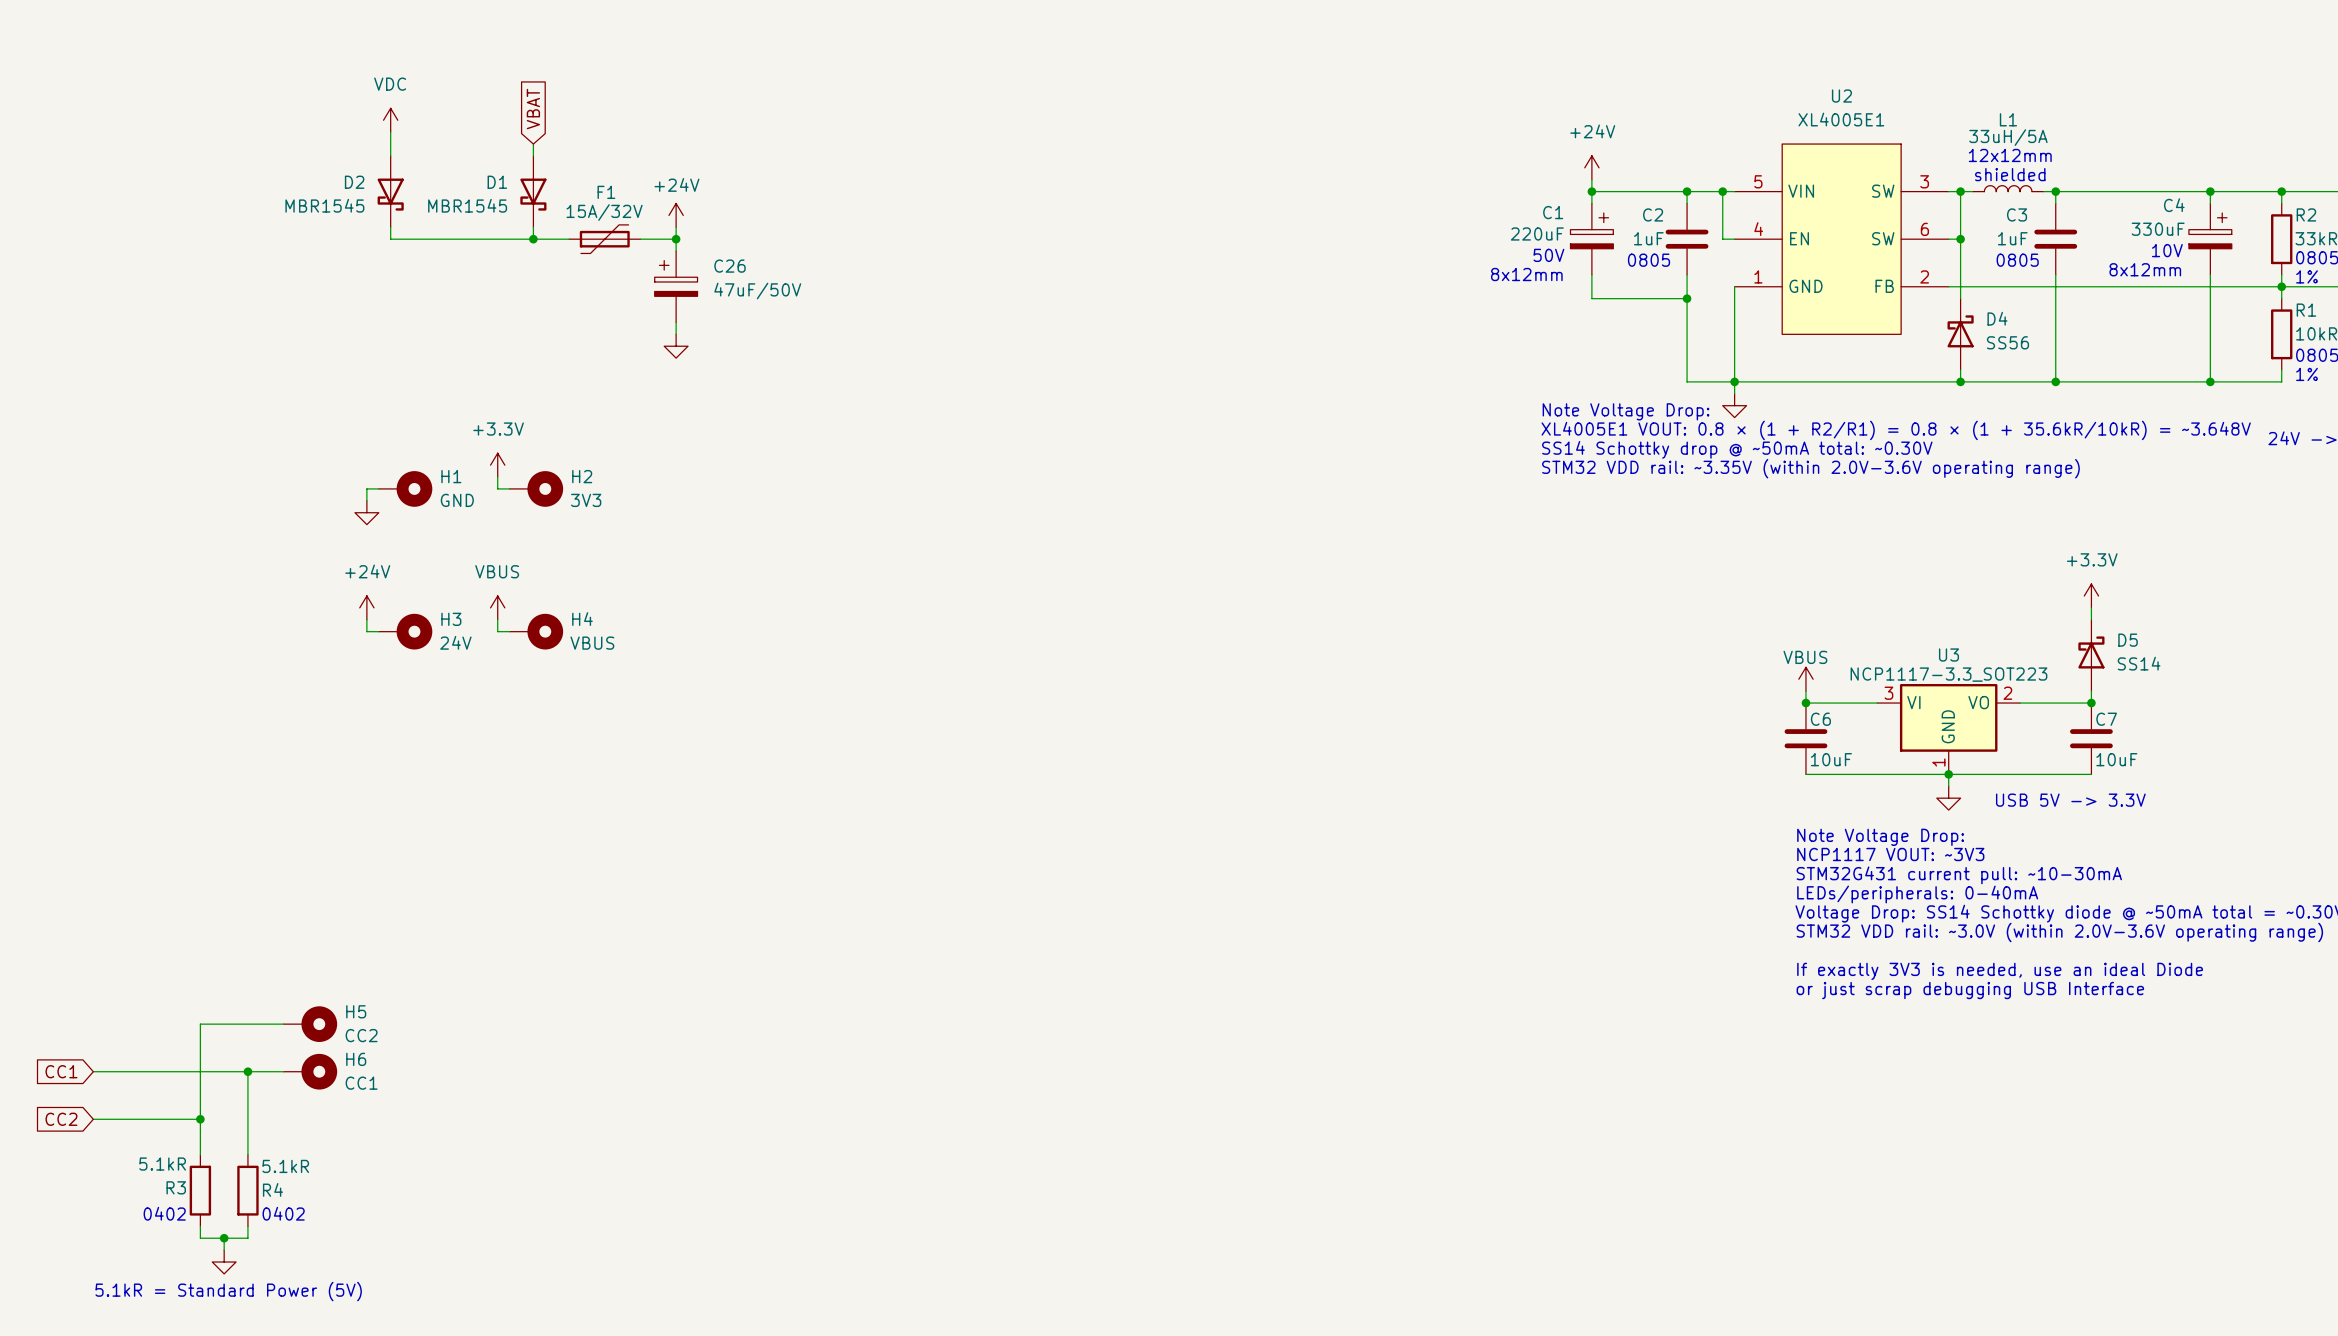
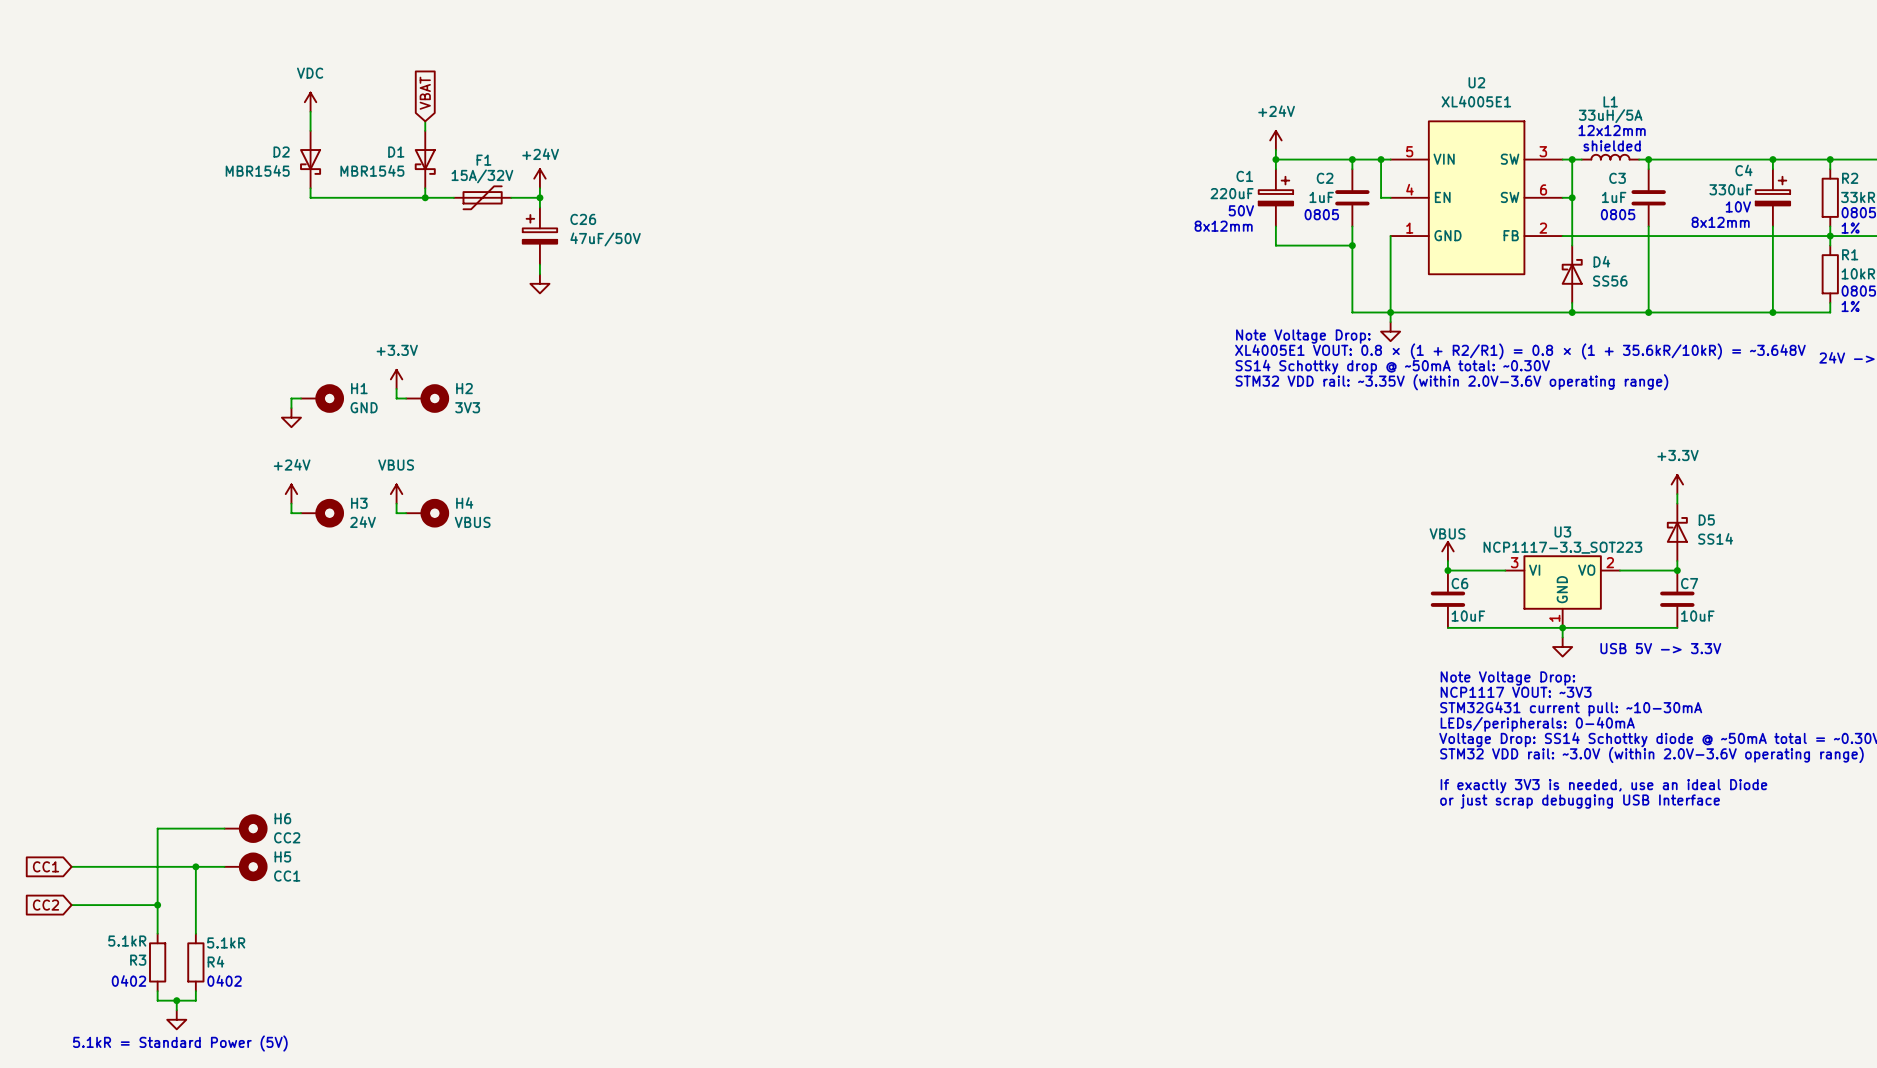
H5 name: H5 (356, 1011) -> H6 (282, 818)
H6 name: H6 (356, 1059) -> H5 (282, 856)

